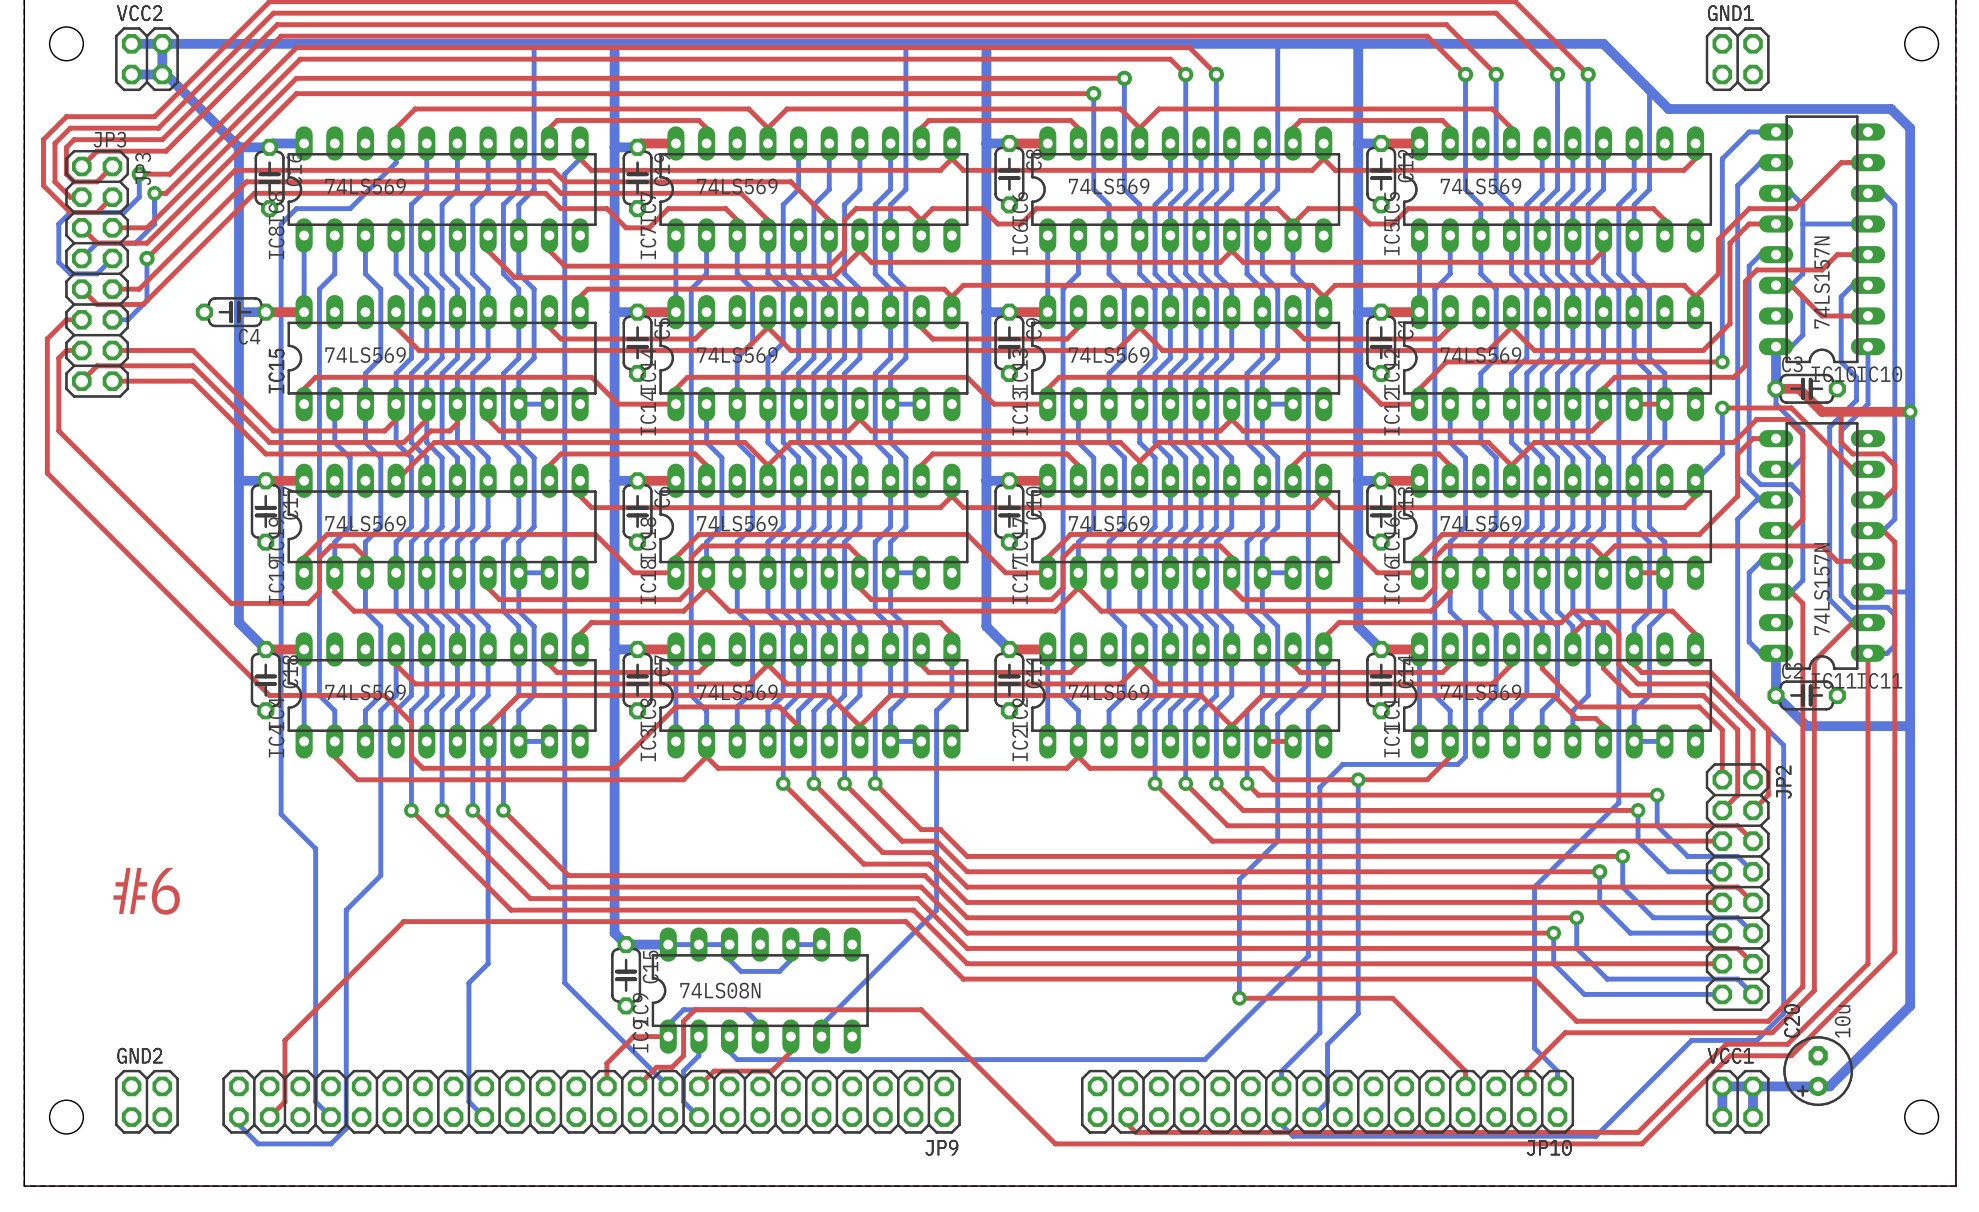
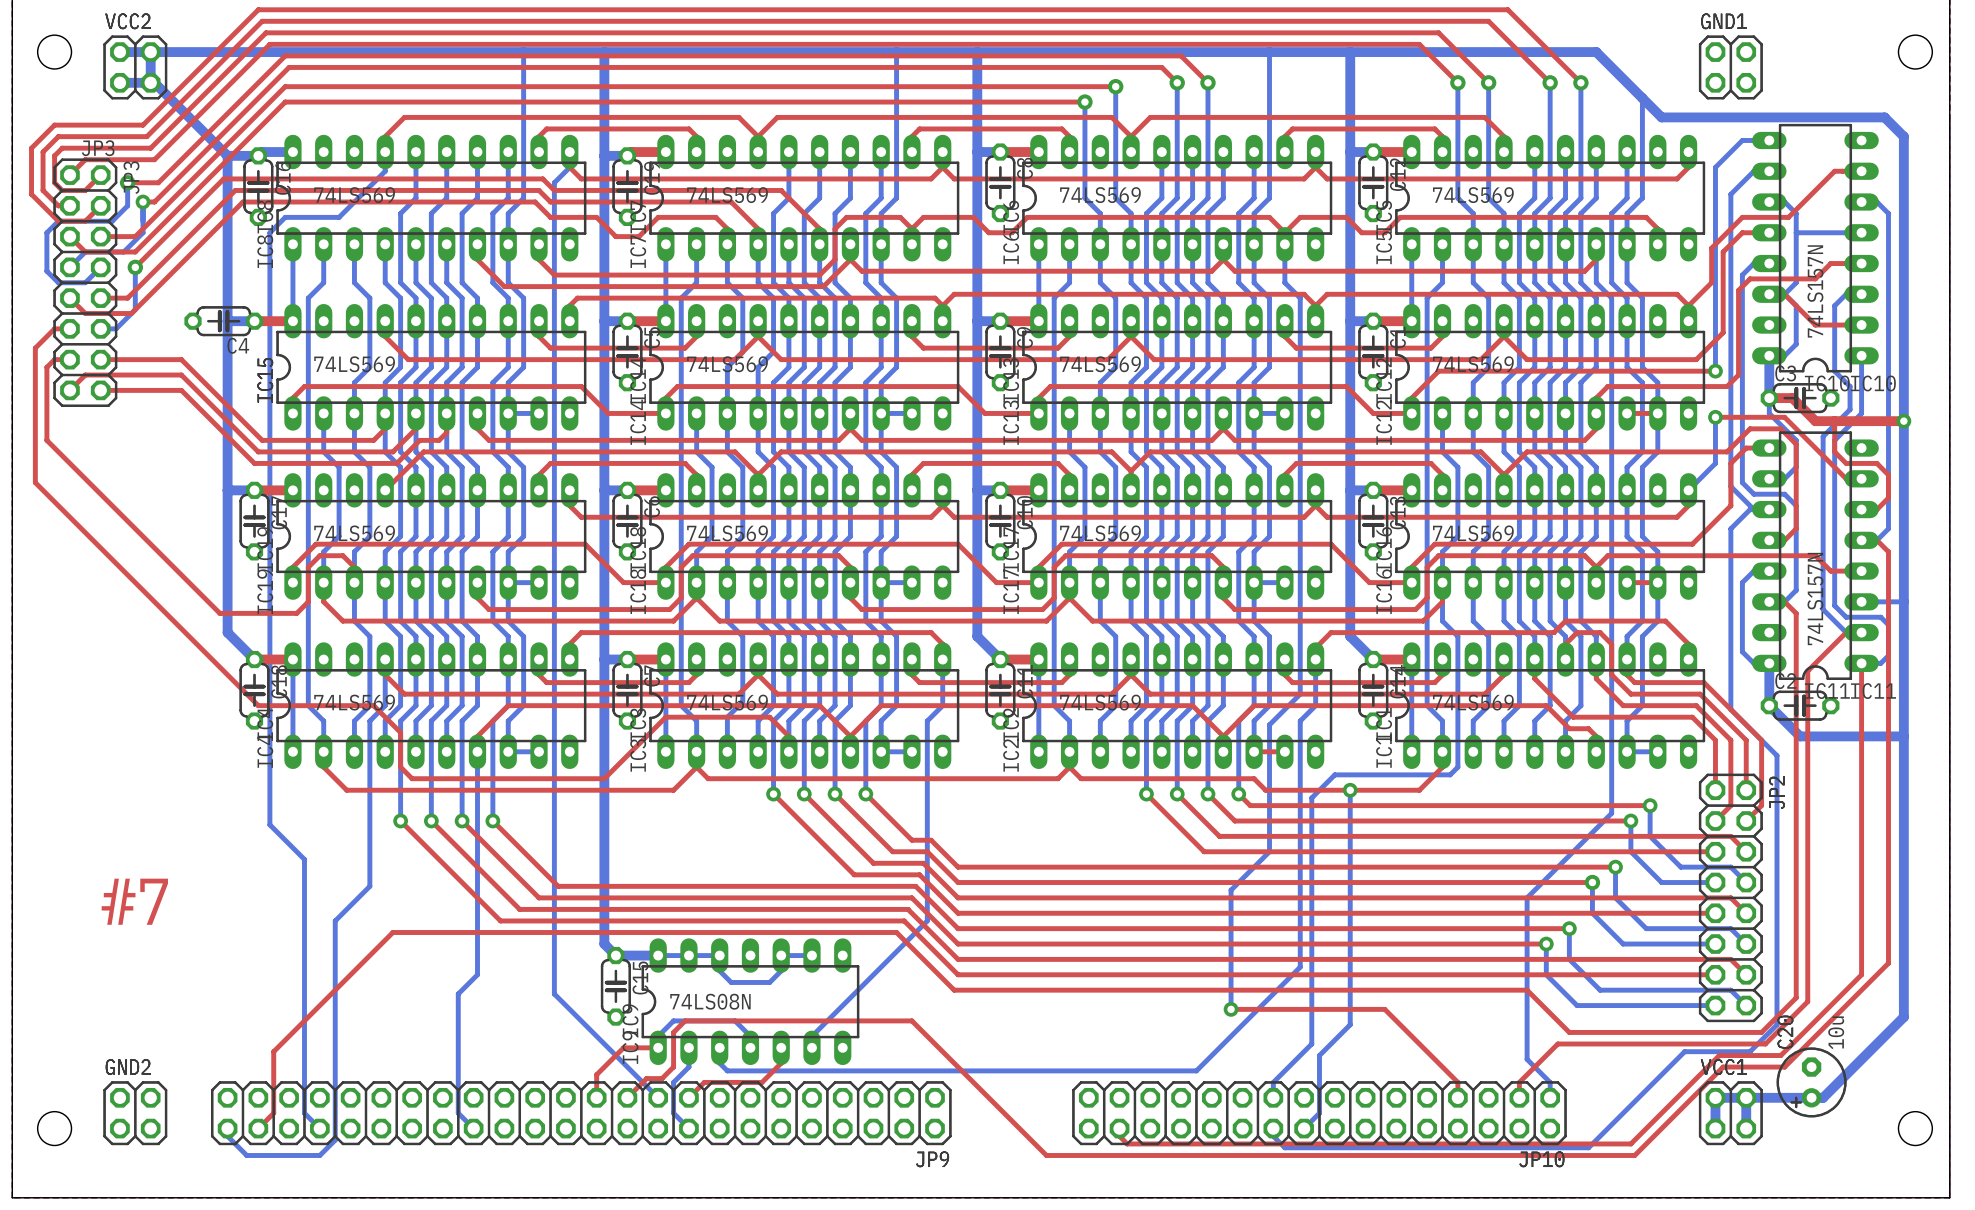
text: #6 (146, 891) -> #7 (134, 901)

